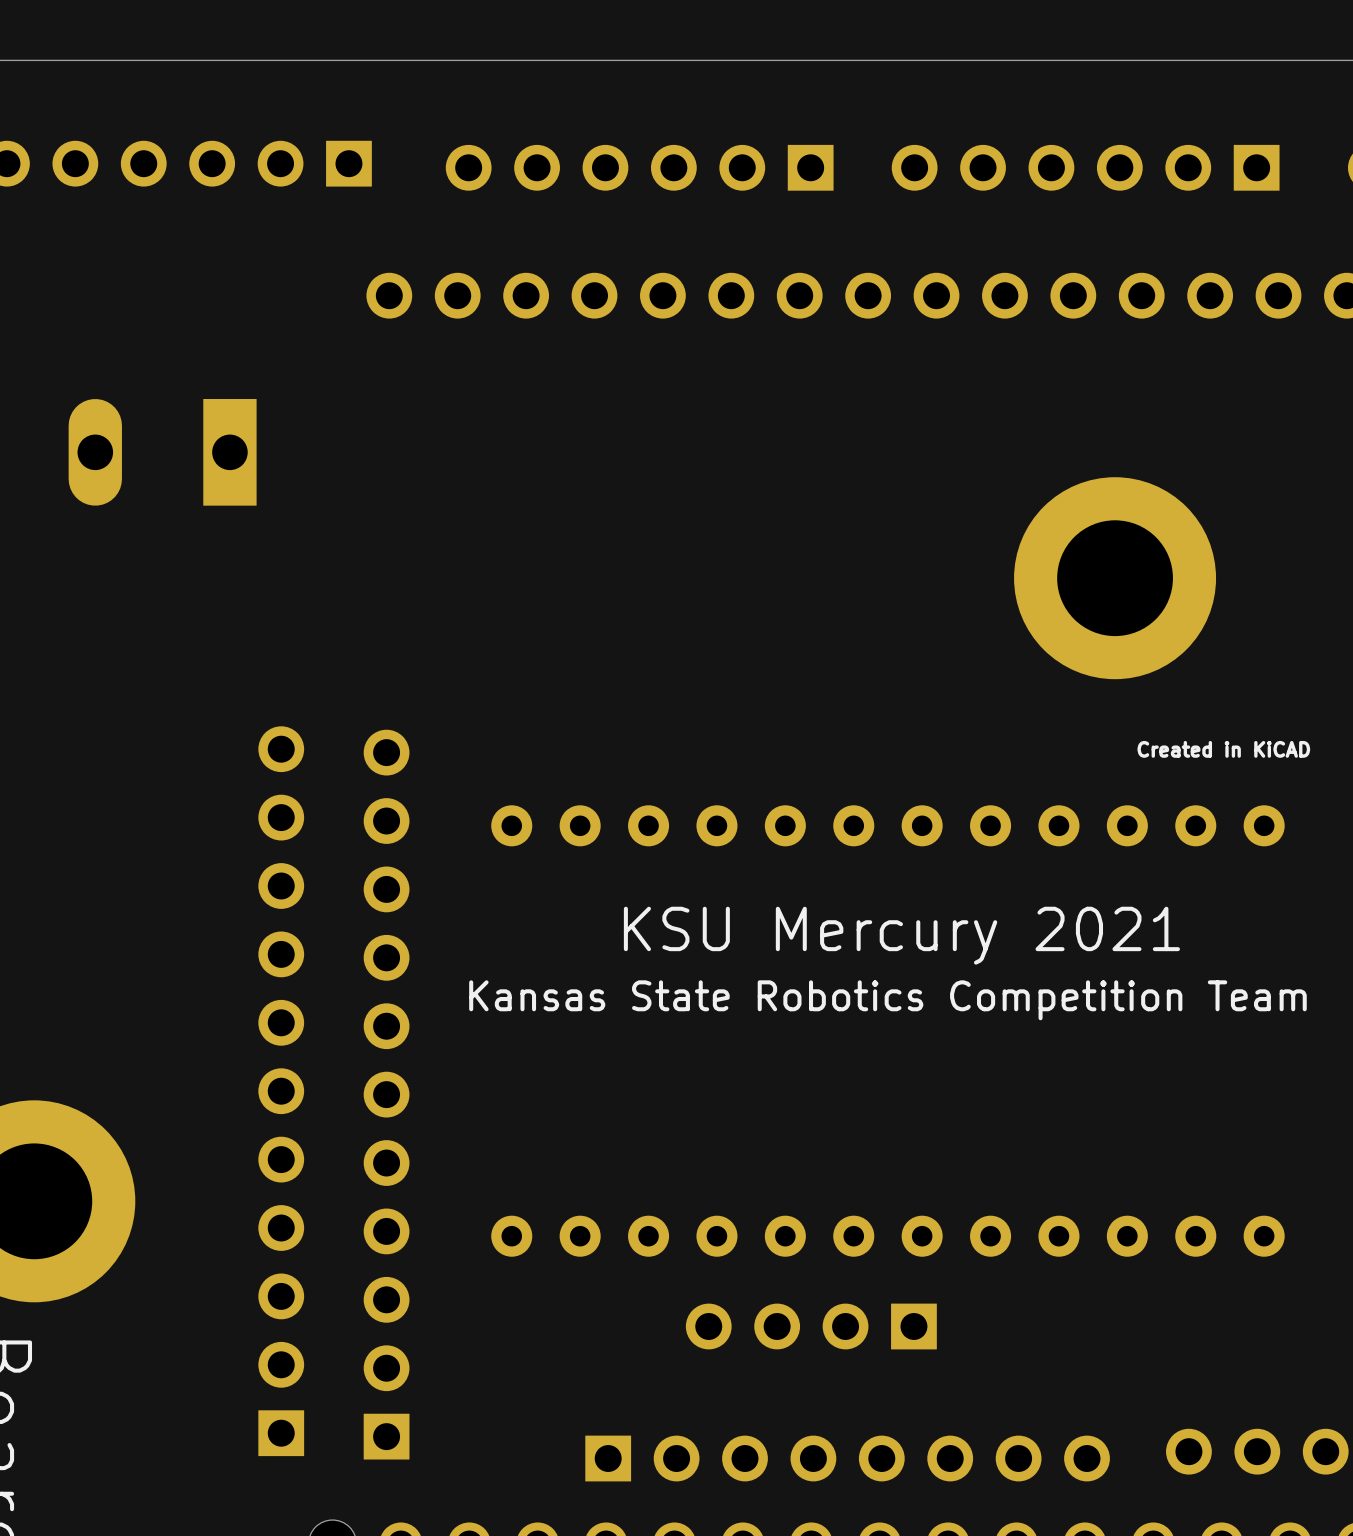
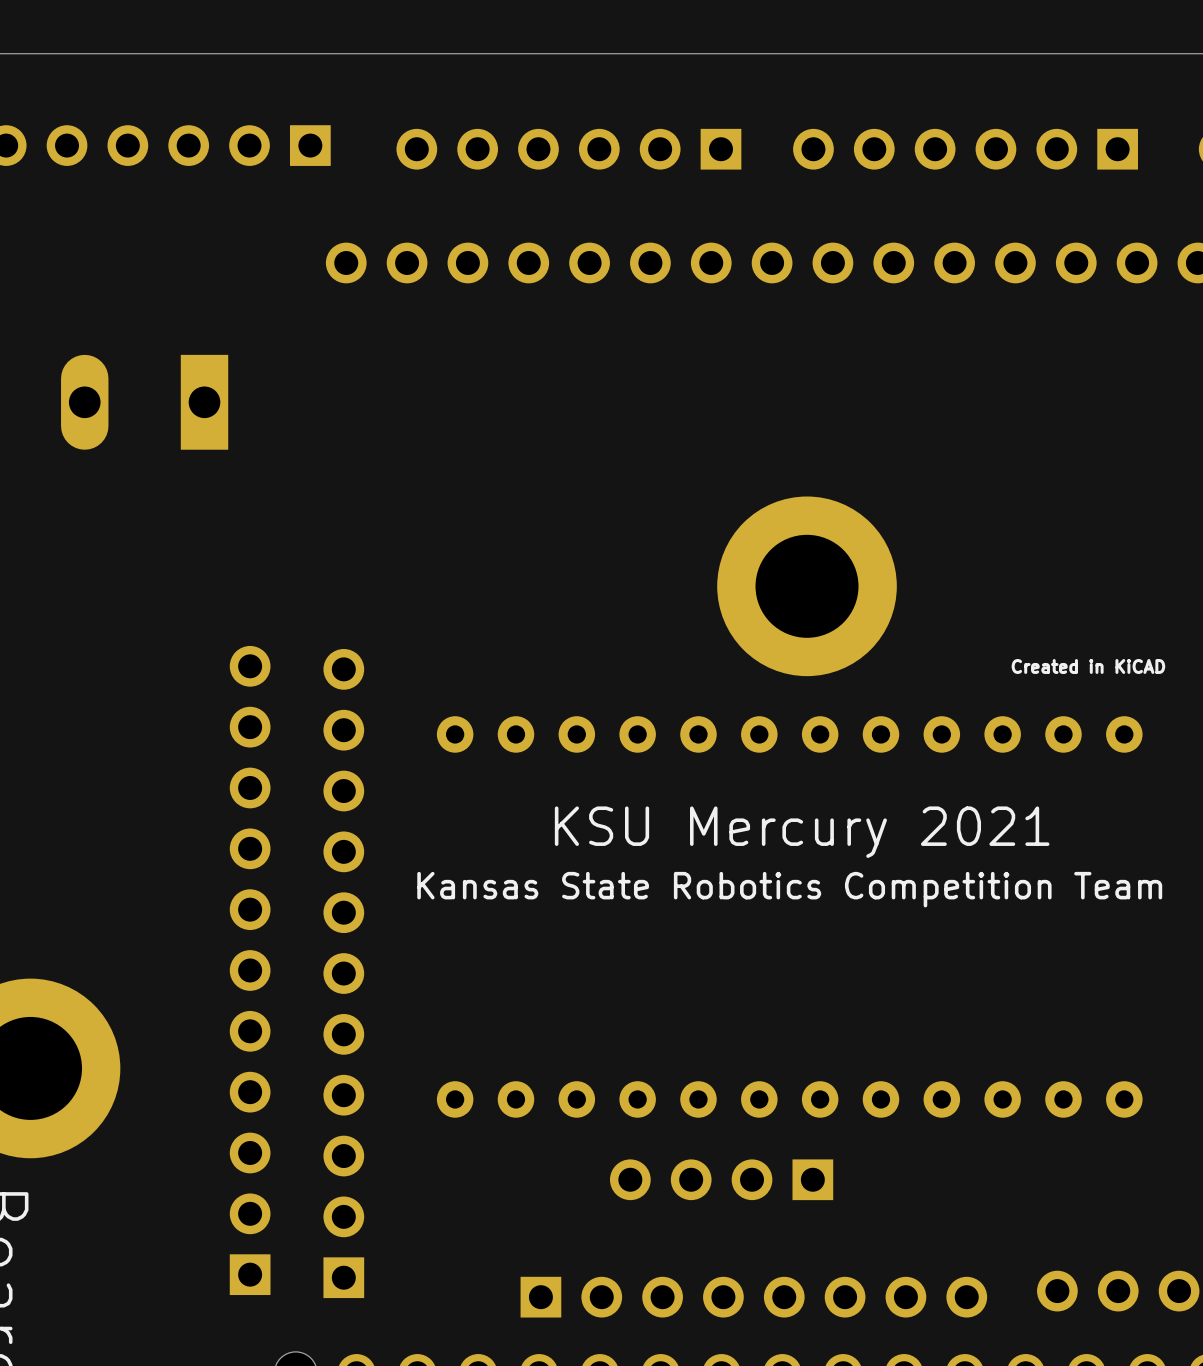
part position: (1115, 578) -> (807, 586)

